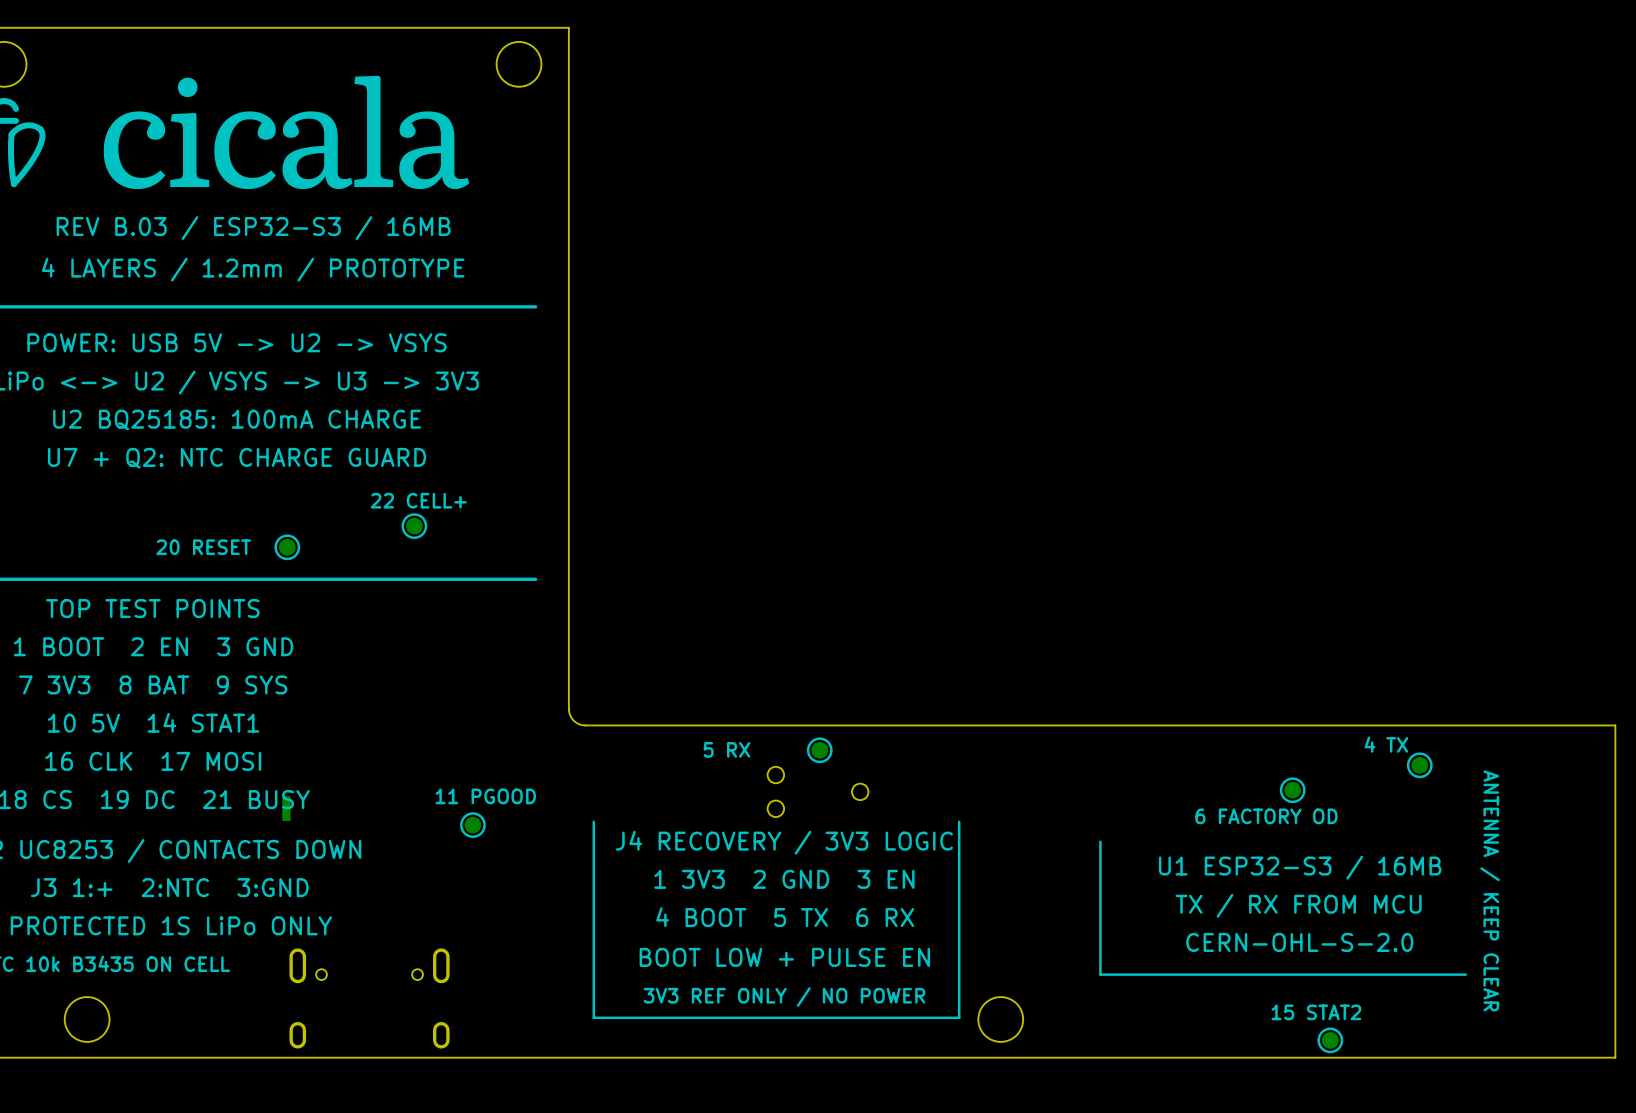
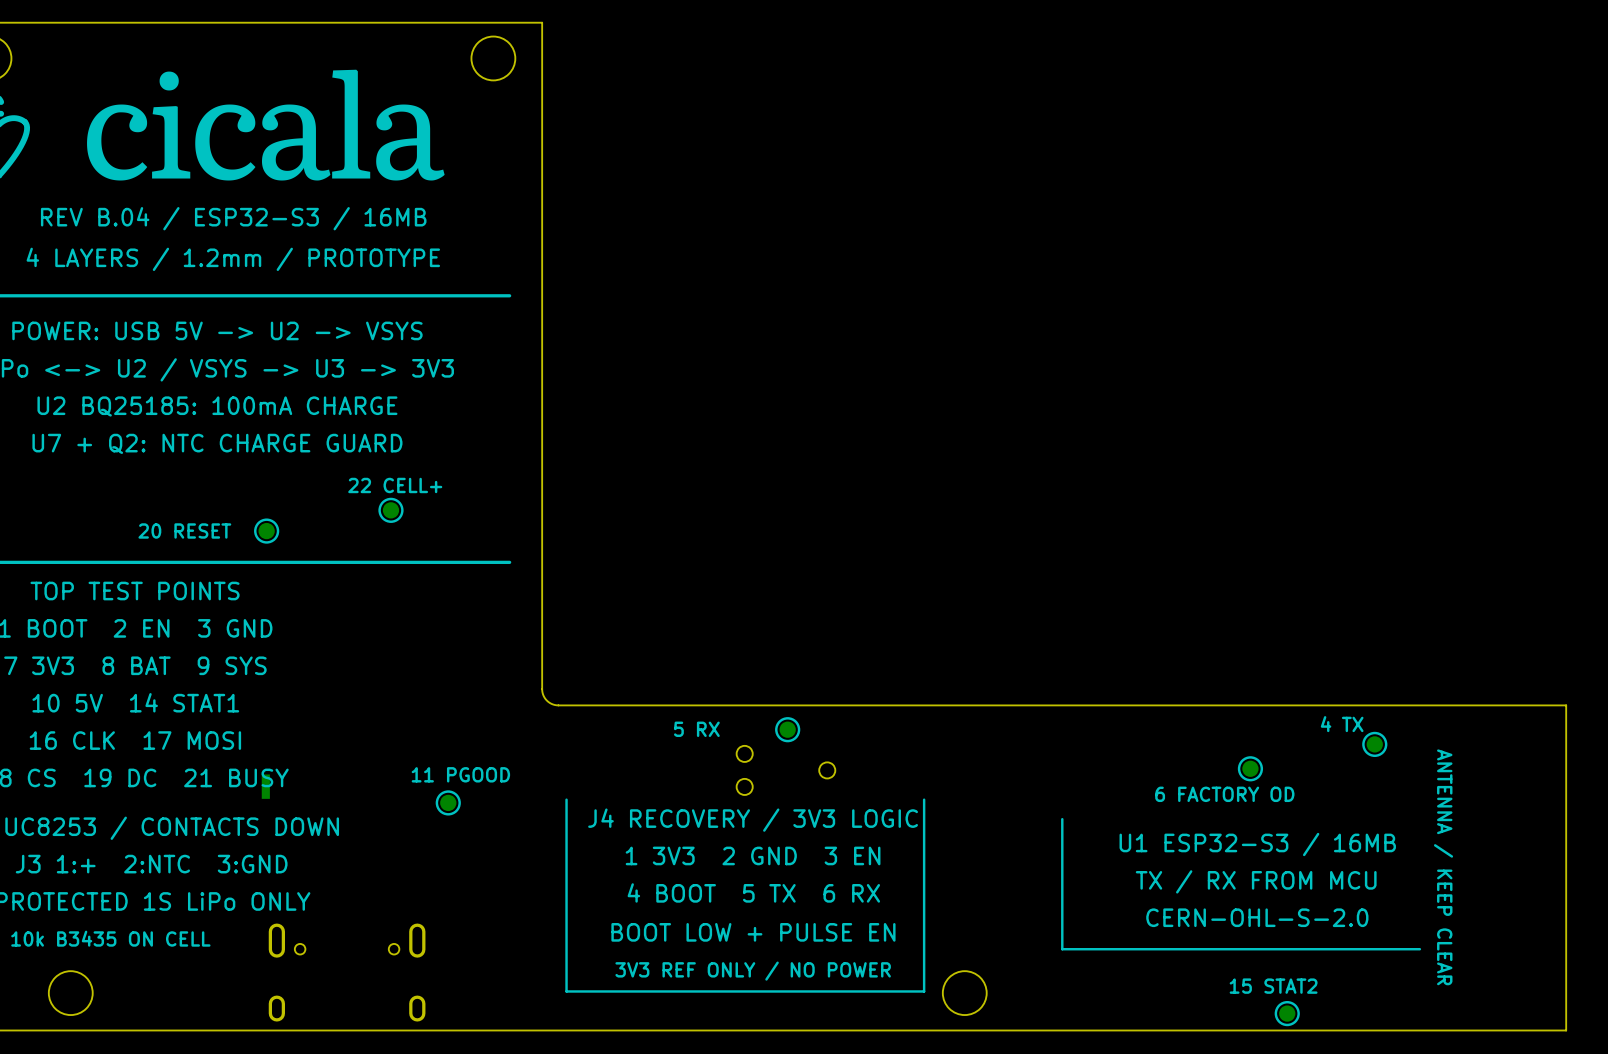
text: REV B.03 / ESP32-S3 / 16MB (253, 228) -> REV B.04 / ESP32-S3 / 16MB (233, 218)

